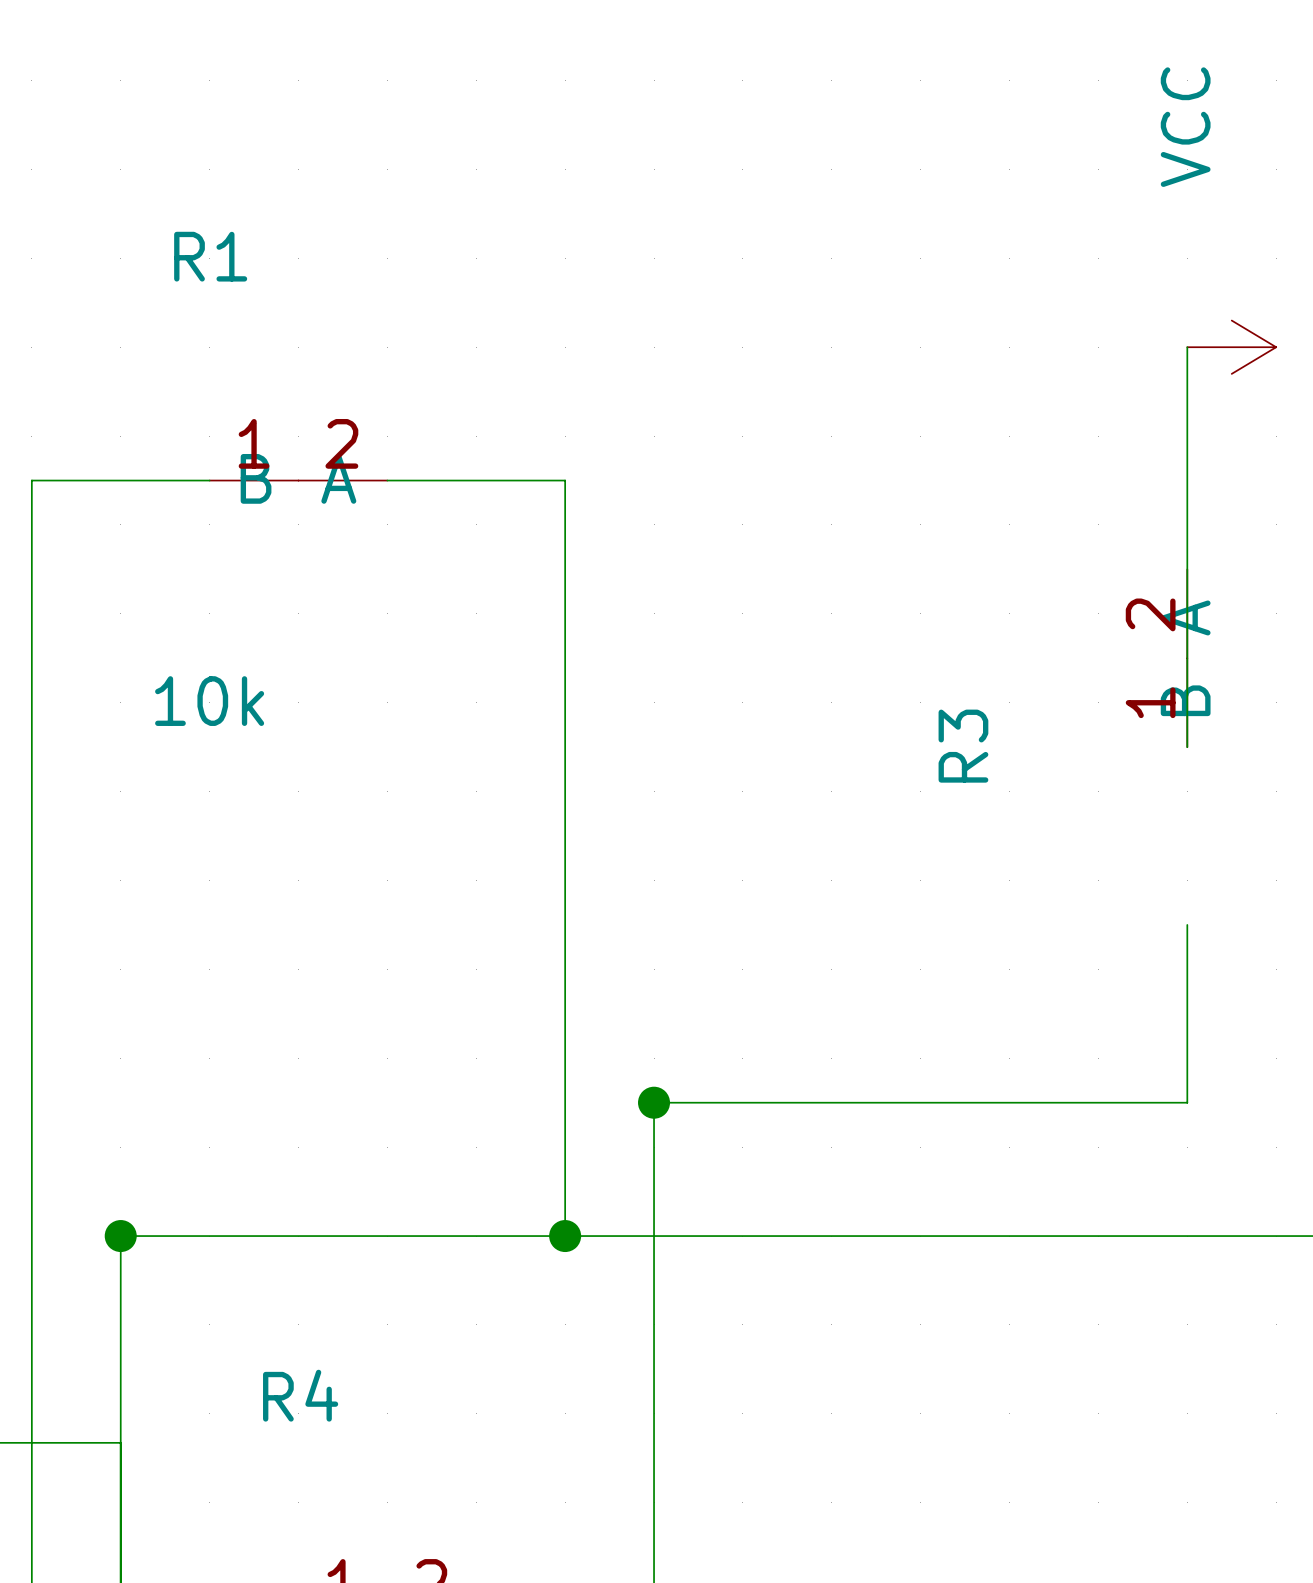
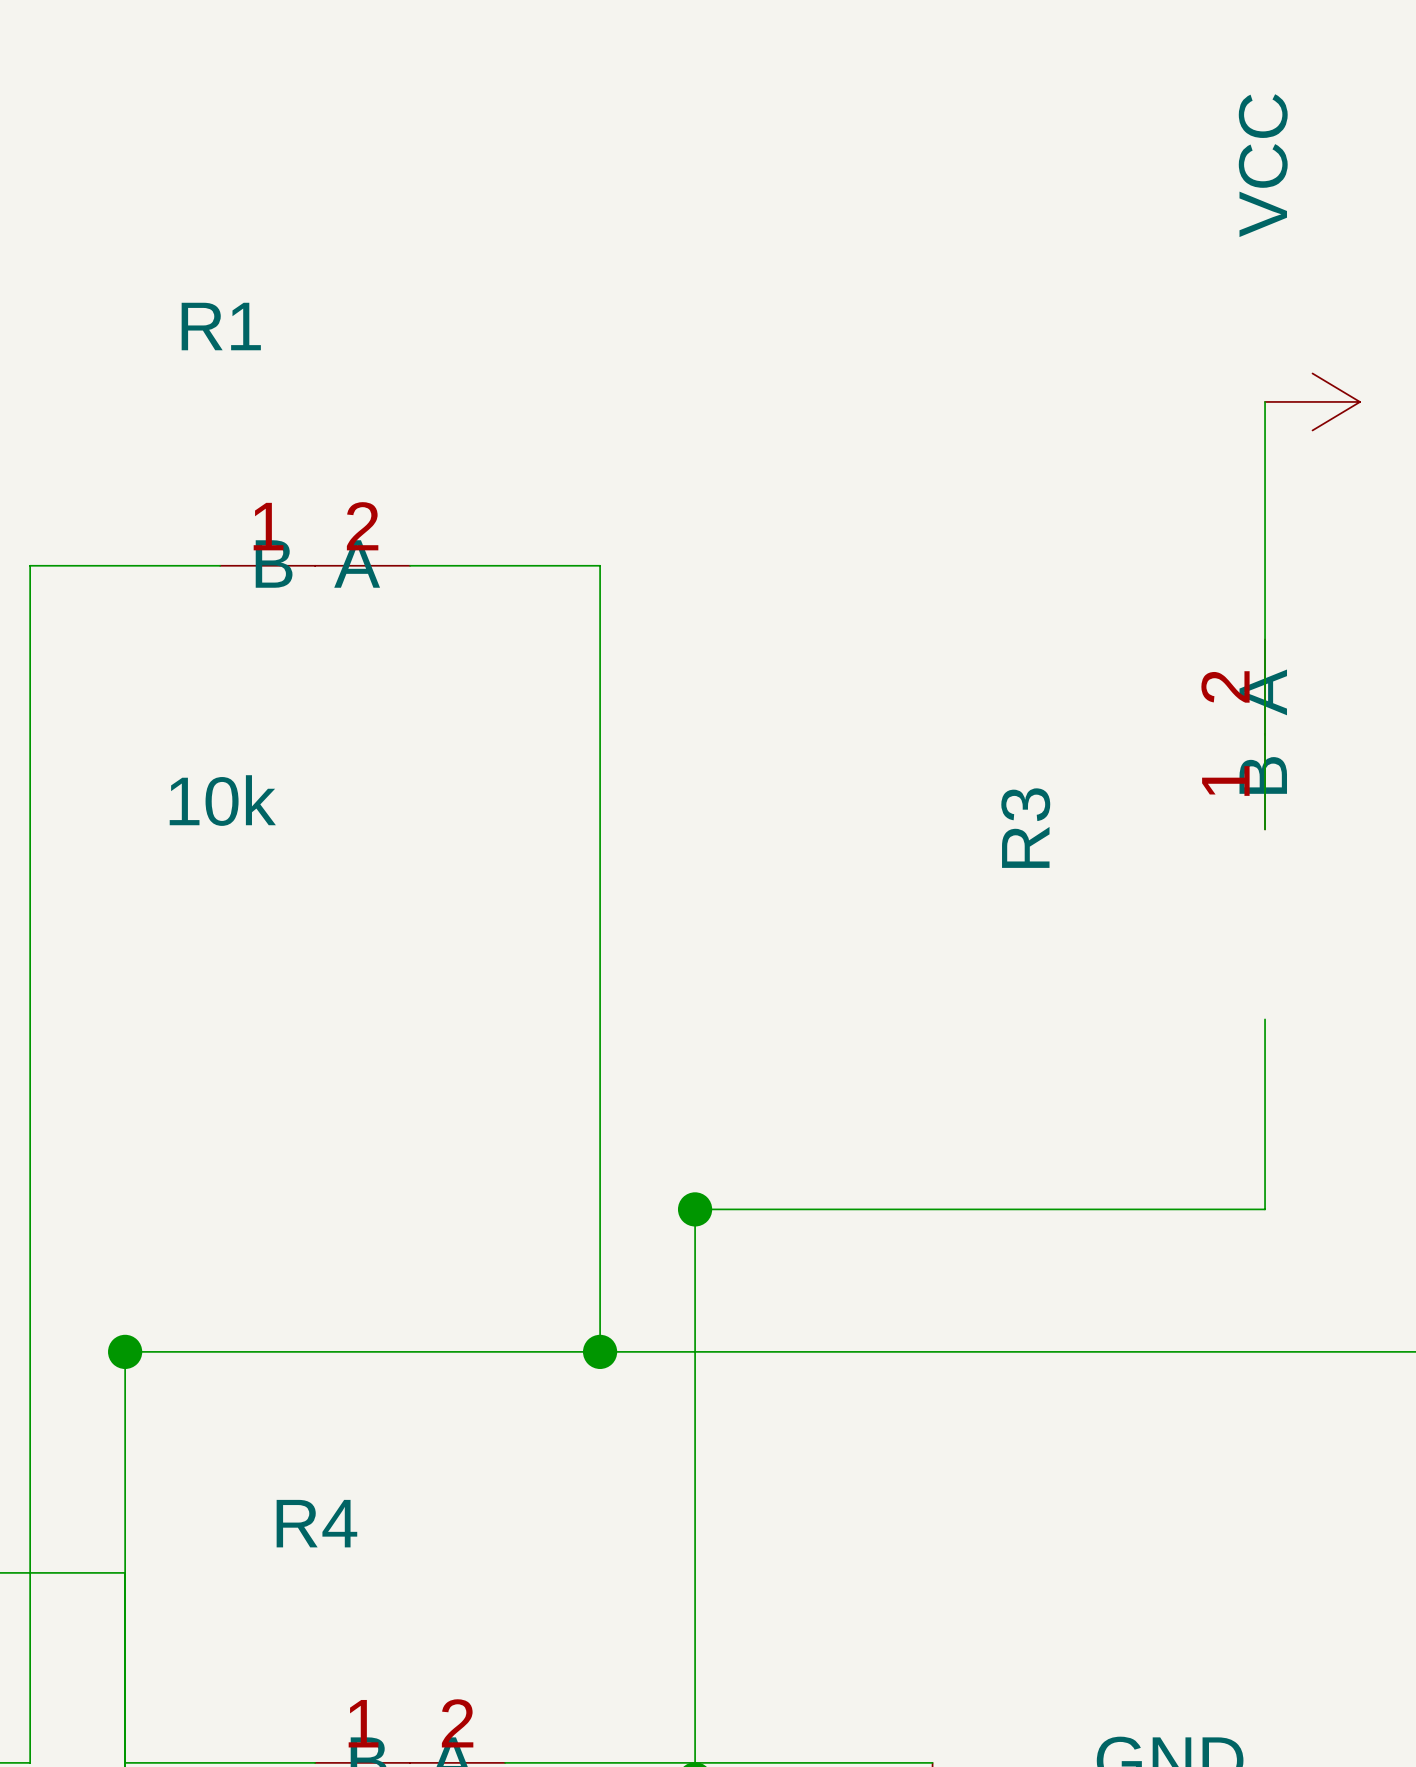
wire: (209, 480) (31, 480) (31, 500) -> (220, 565) (30, 565)
R1 position: (298, 480) -> (315, 565)
wire: (387, 480) (565, 480) (565, 500) -> (410, 565) (600, 565)

